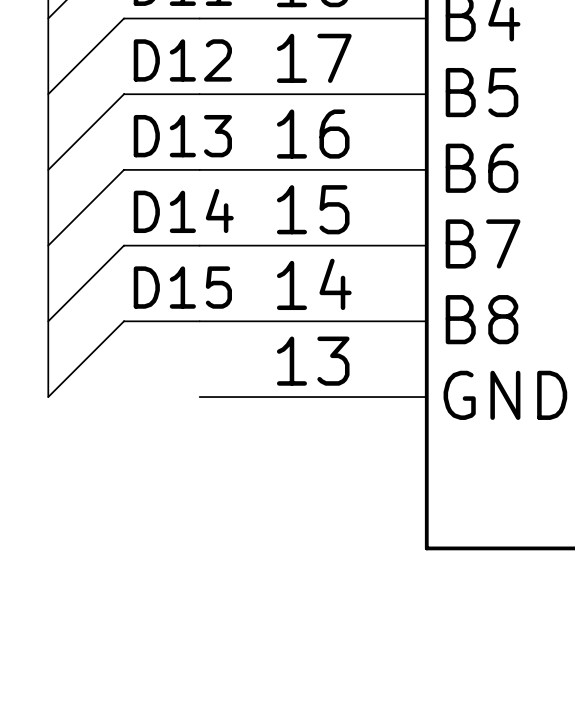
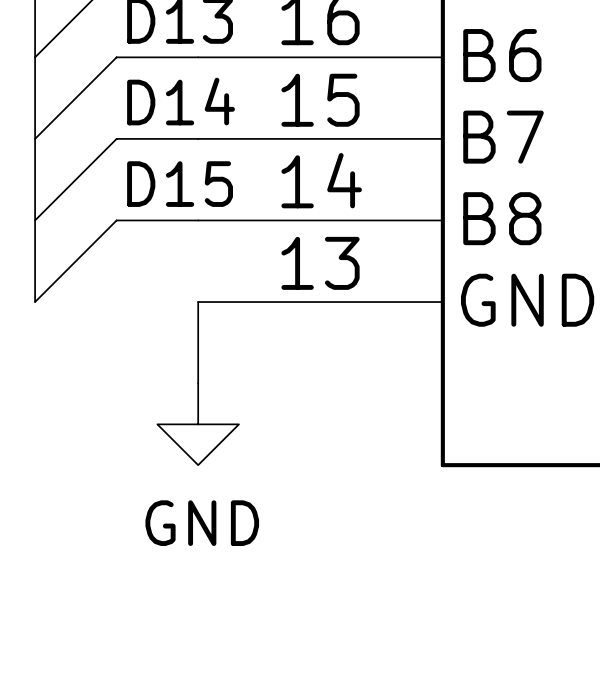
wire: none -> (198, 302) (198, 383)
power symbol: none -> GND (198, 424)

